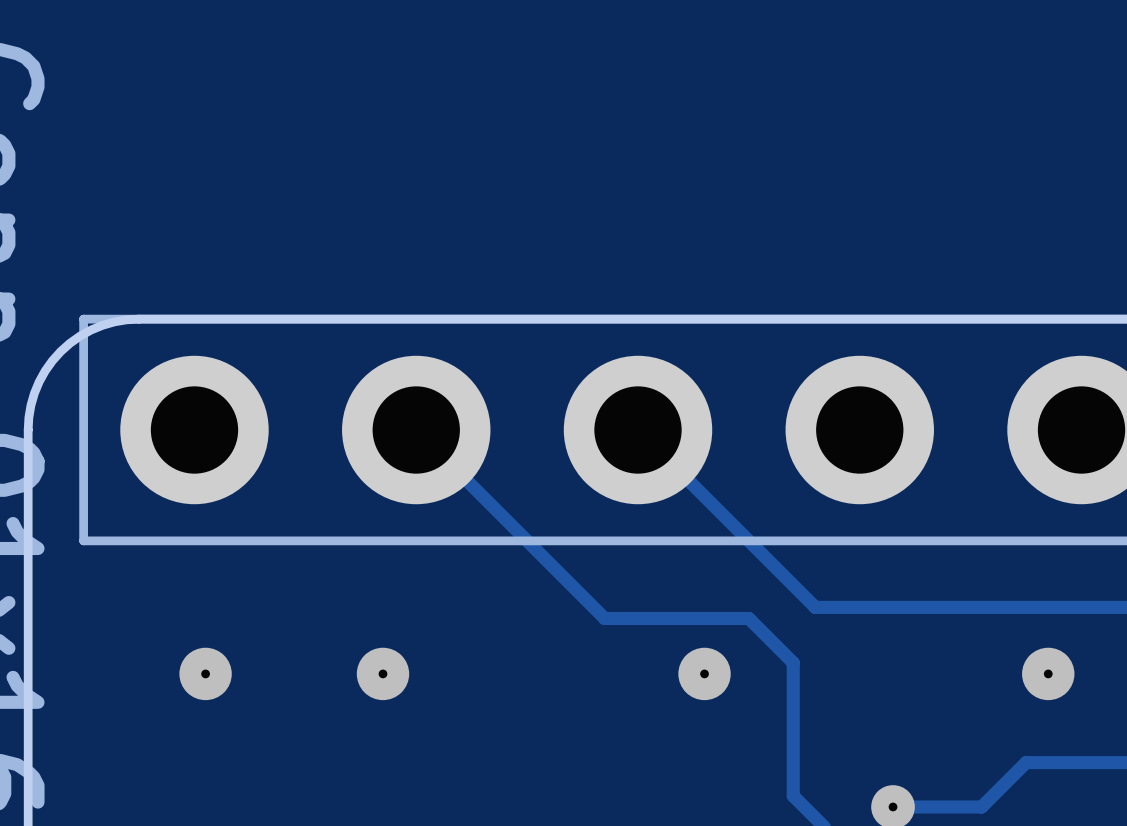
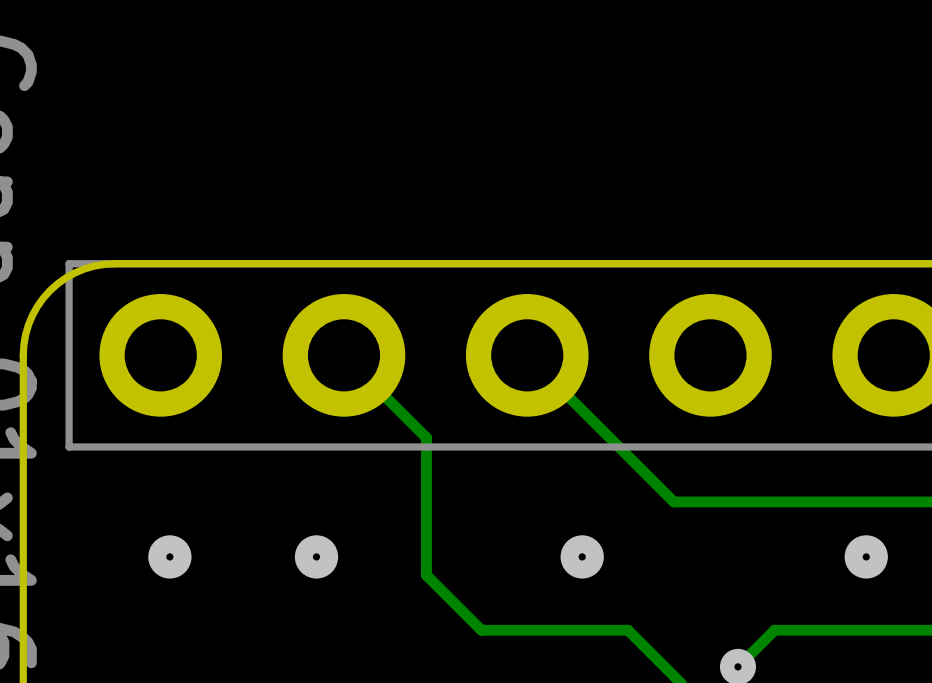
track: (516, 529) (604, 618) (748, 618) (793, 662) (793, 795) -> (426, 437) (426, 575) (481, 630) (628, 630) (655, 657)
track: (1026, 762) (981, 806) (893, 806) -> (847, 630) (774, 630) (737, 666)

